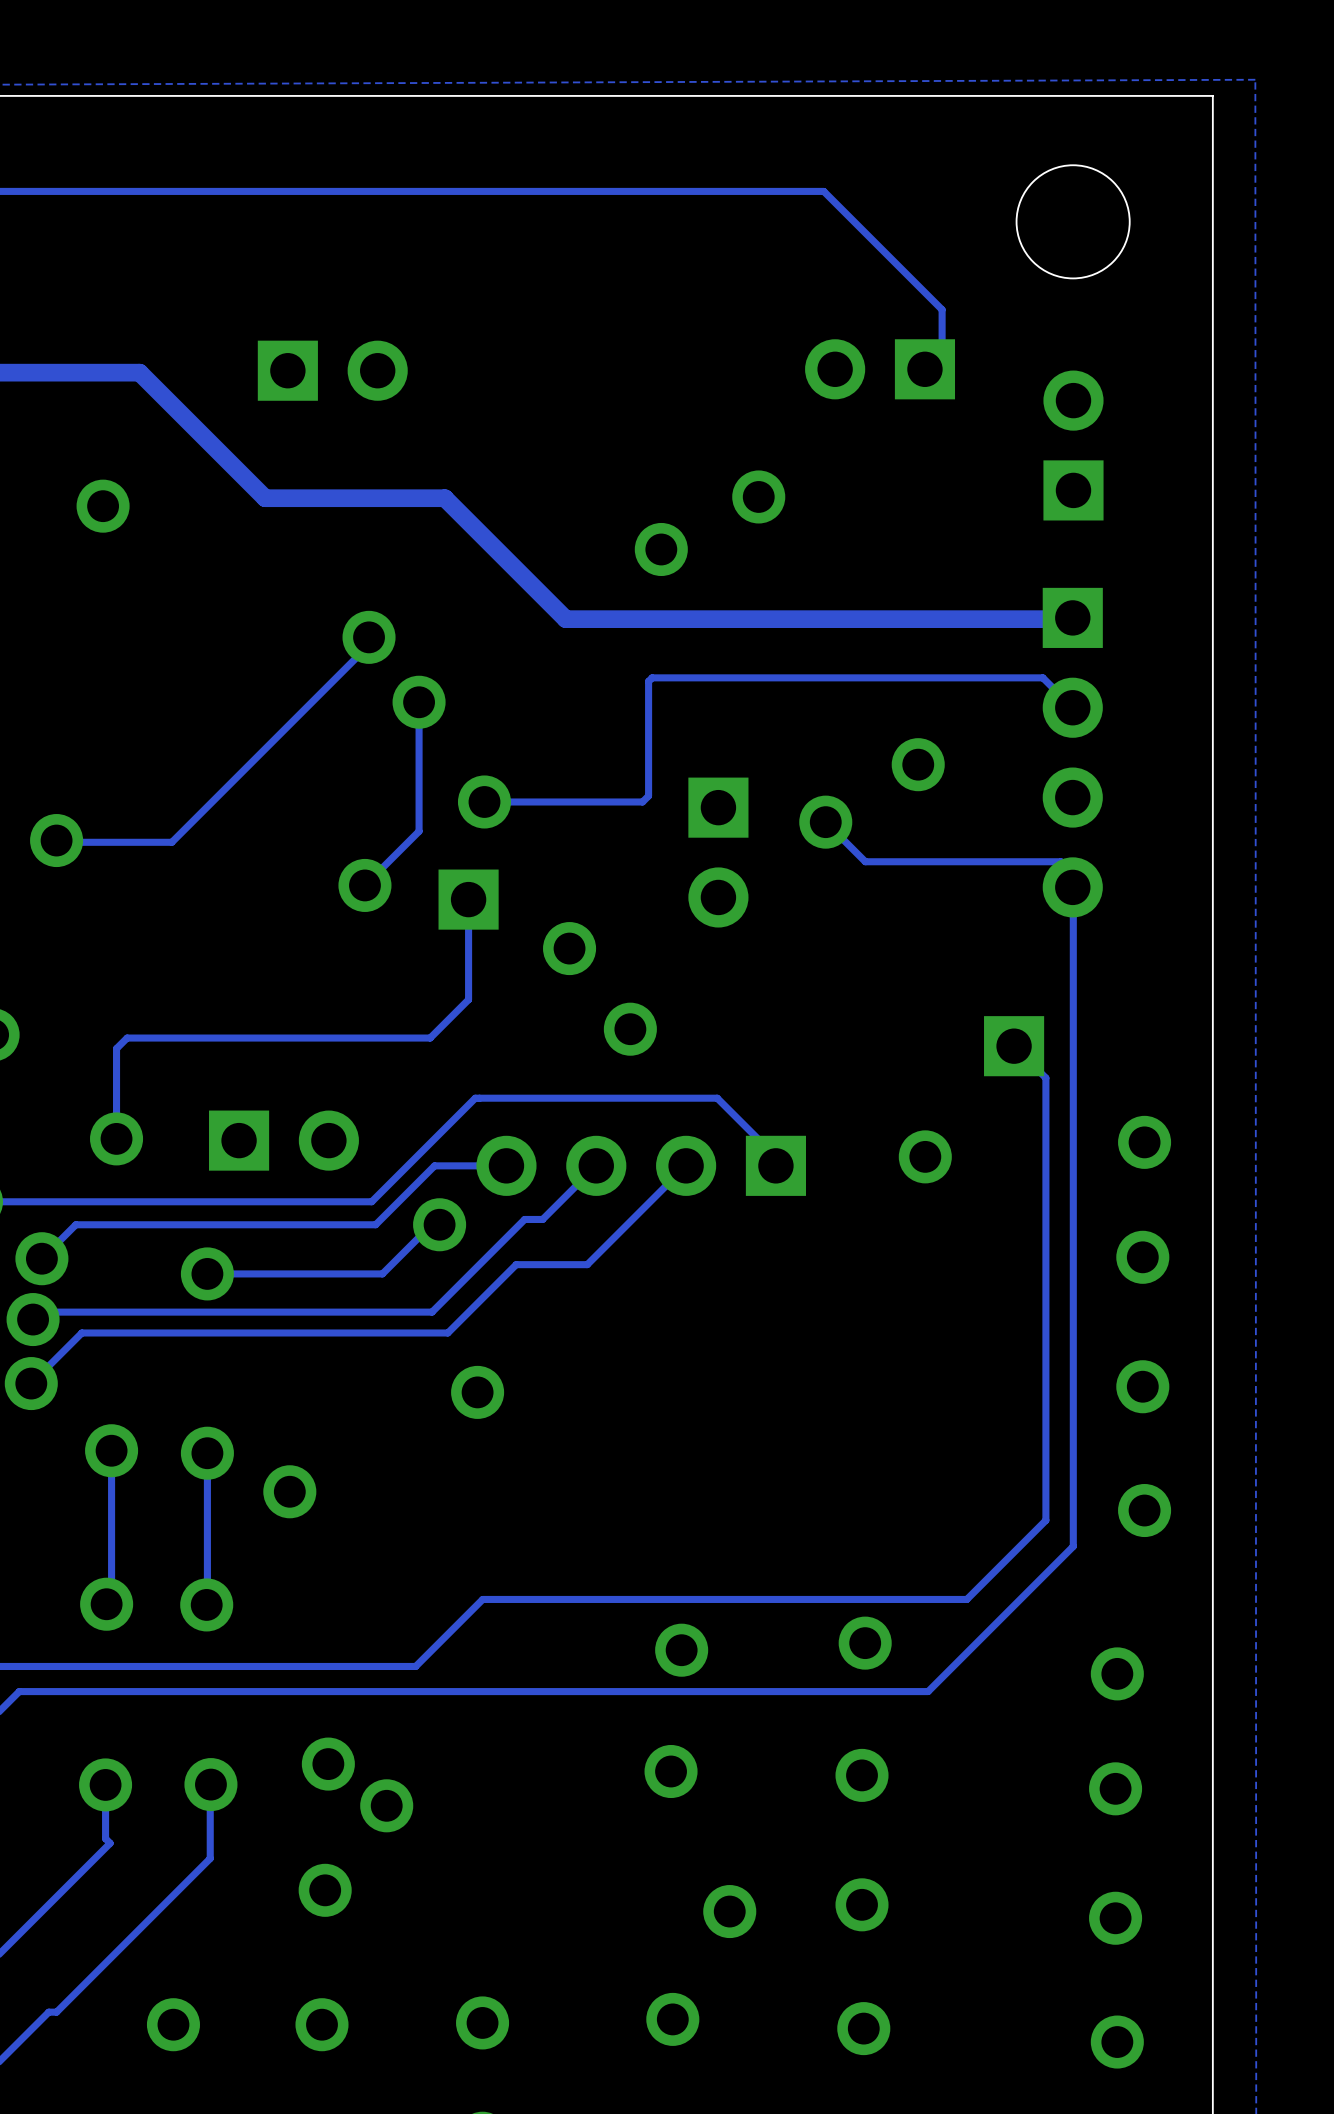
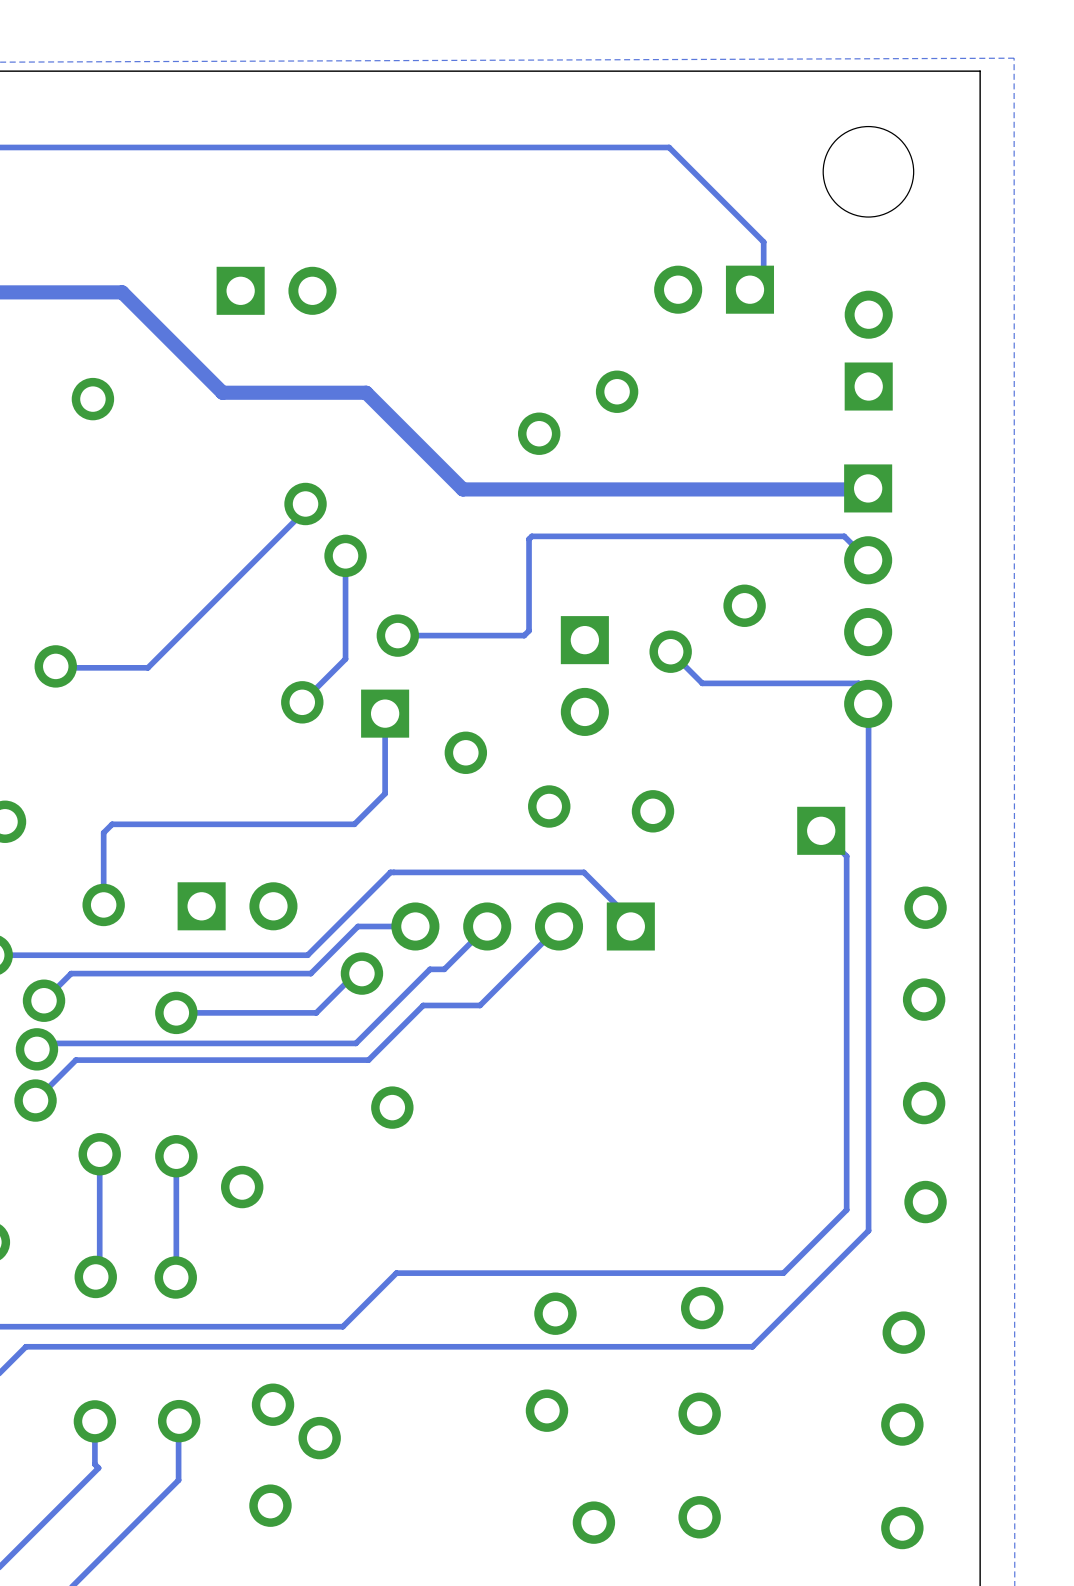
via: none -> (653, 811)
via position: (630, 1029) -> (549, 806)
via: (925, 1156) -> none

